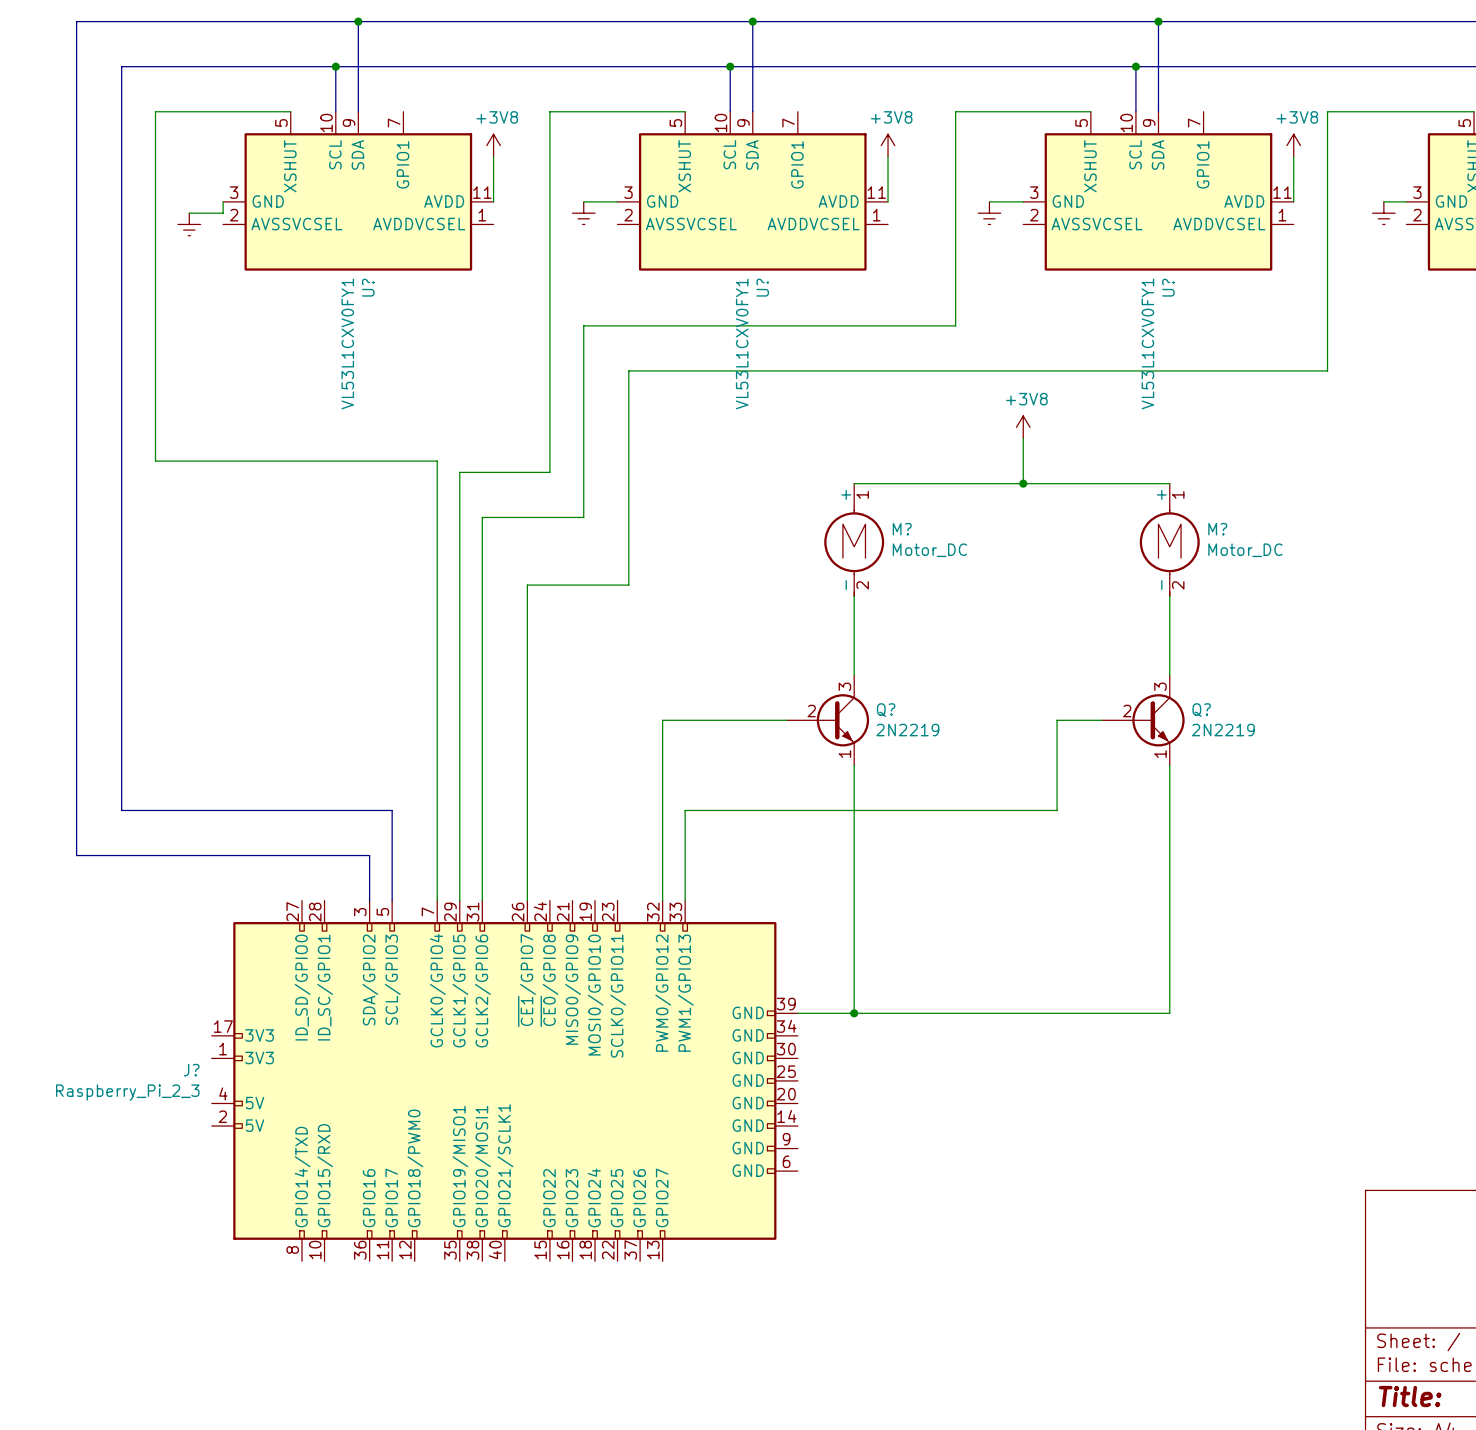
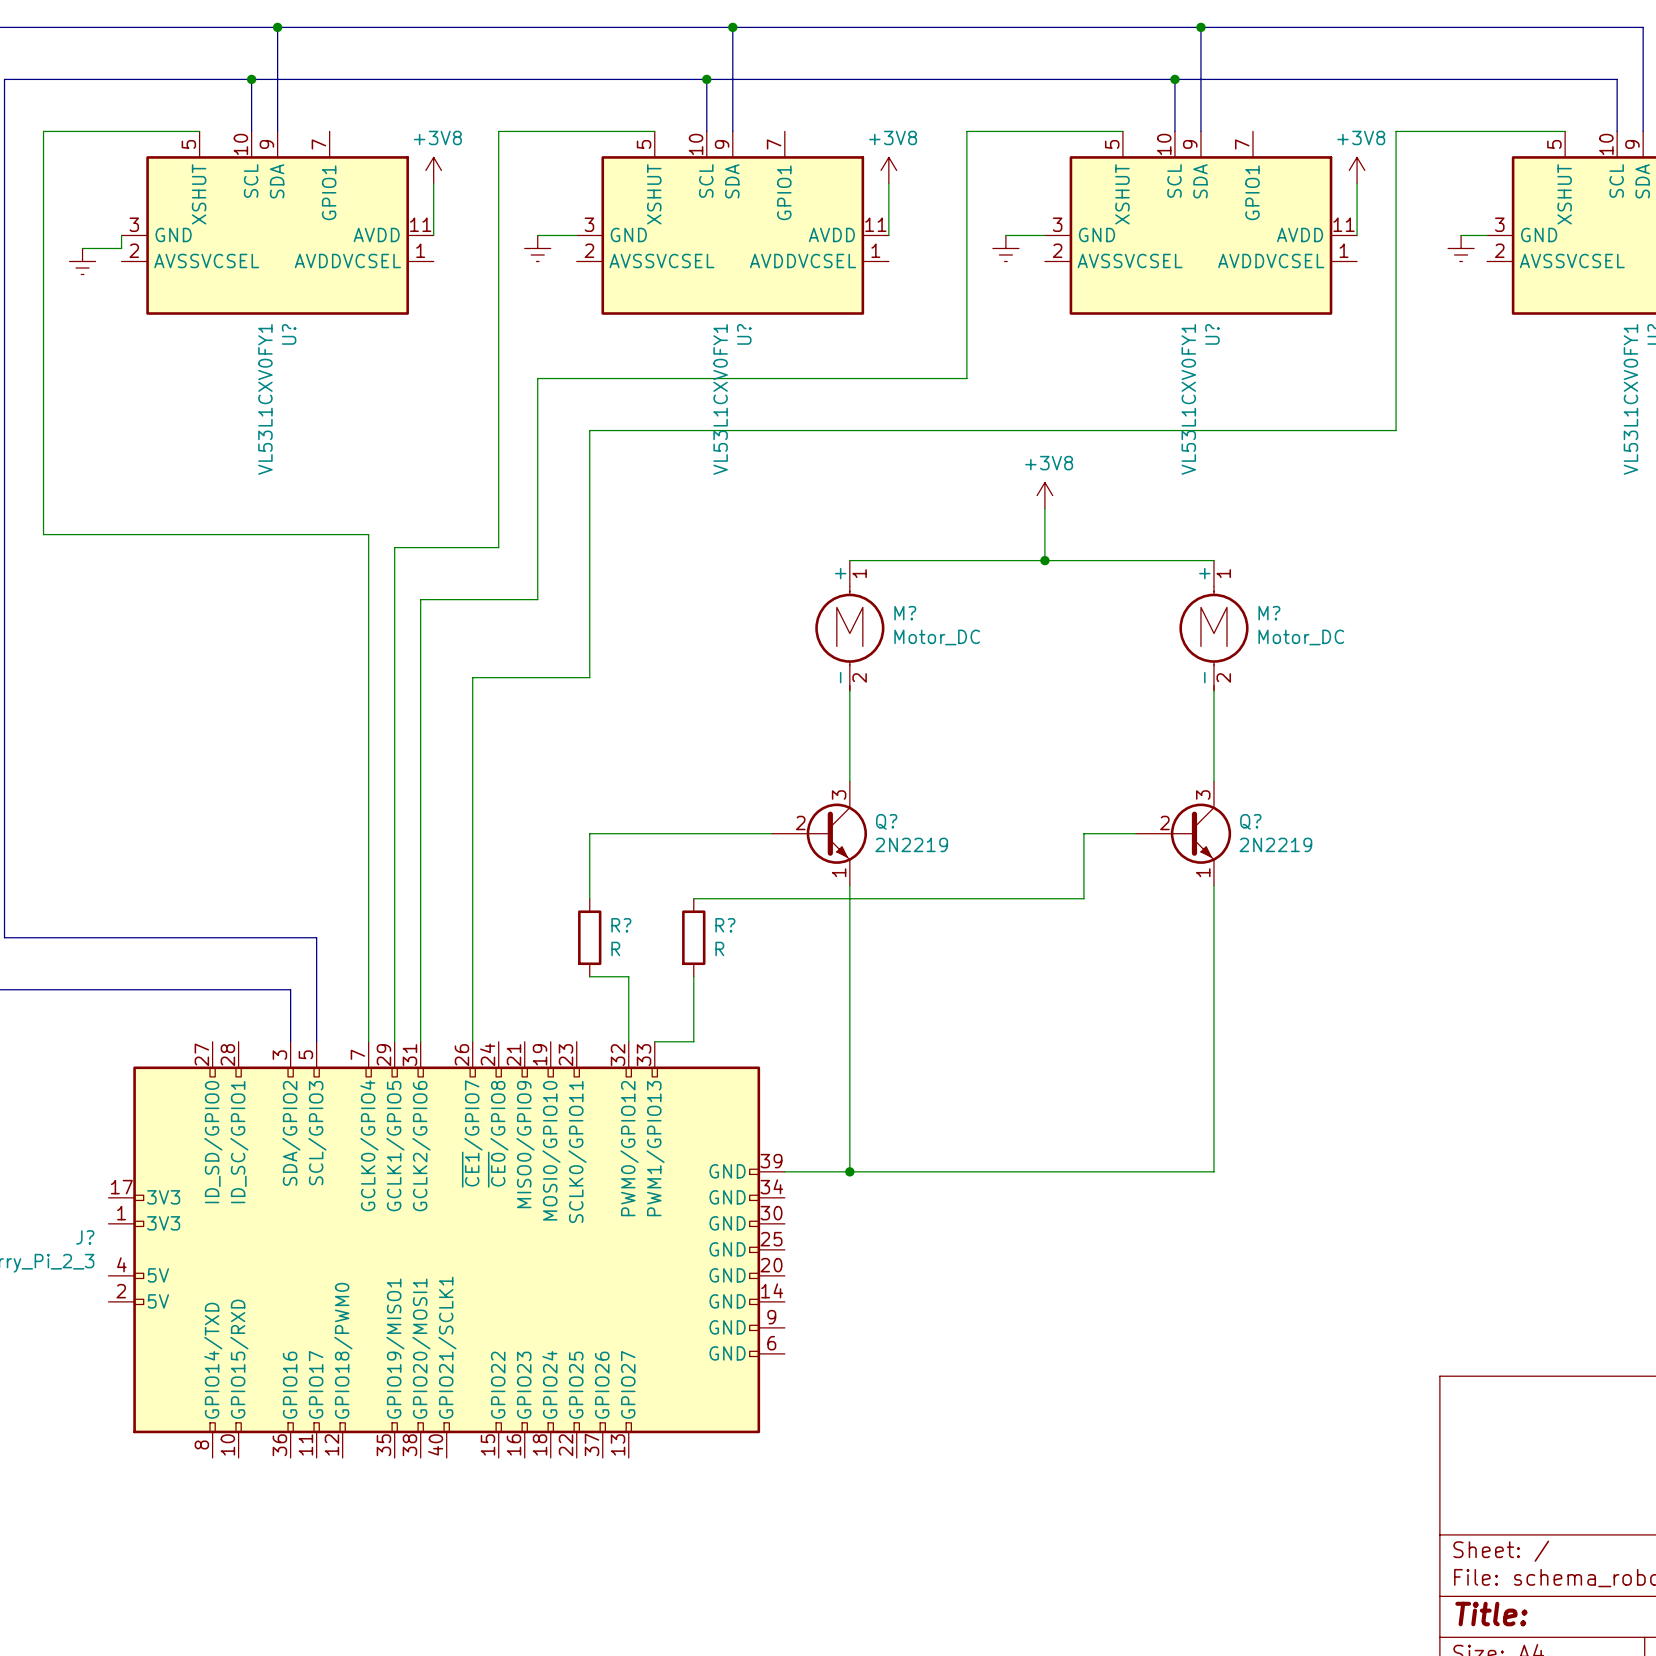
wire: (662, 720) (662, 844) -> (628, 833) (589, 833) (589, 898)
wire: (1057, 776) (1057, 810) (685, 810) (685, 900) -> (1083, 898) (693, 898)
R?: none -> R (589, 937)
R?: none -> R (693, 937)
wire: none -> (589, 976) (628, 976)
wire: none -> (693, 976) (693, 1041) (654, 1041)

